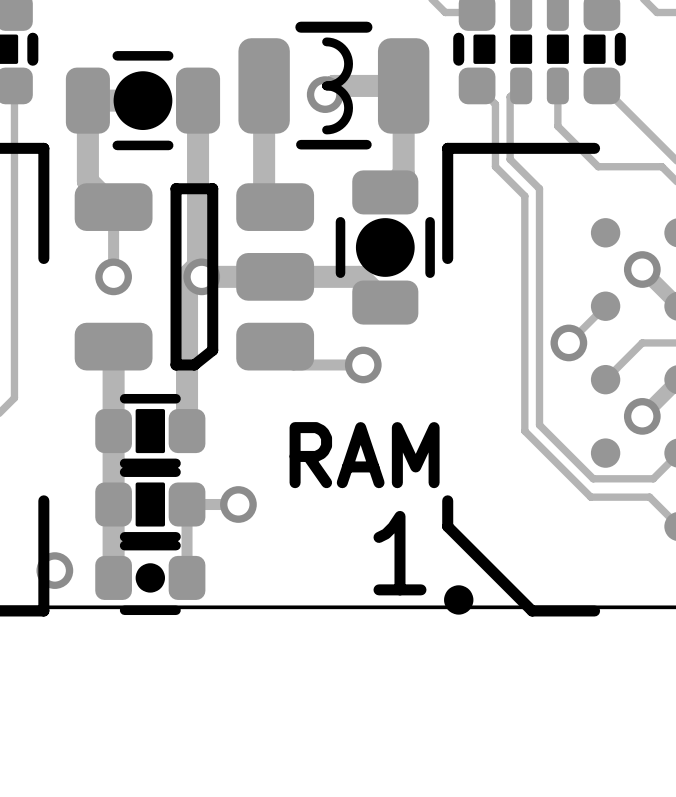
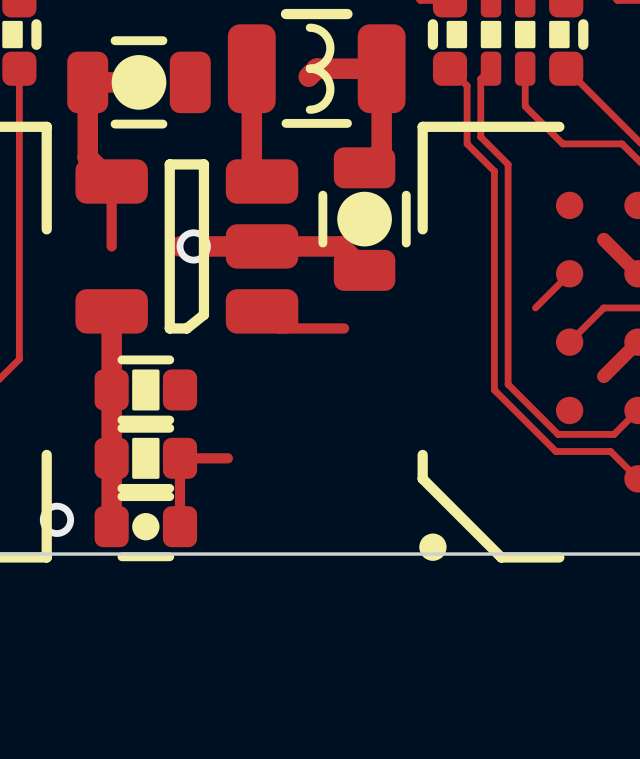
via: (325, 94) -> none
track: (198, 100) (198, 265) (187, 276) (187, 431) -> none
via: (642, 269) -> none
via: (113, 276) -> none
via: (568, 342) -> none
via: (363, 364) -> none
via: (642, 416) -> none
text: RAM (364, 455) -> none
via: (238, 504) -> none
text: 1 (399, 553) -> none

